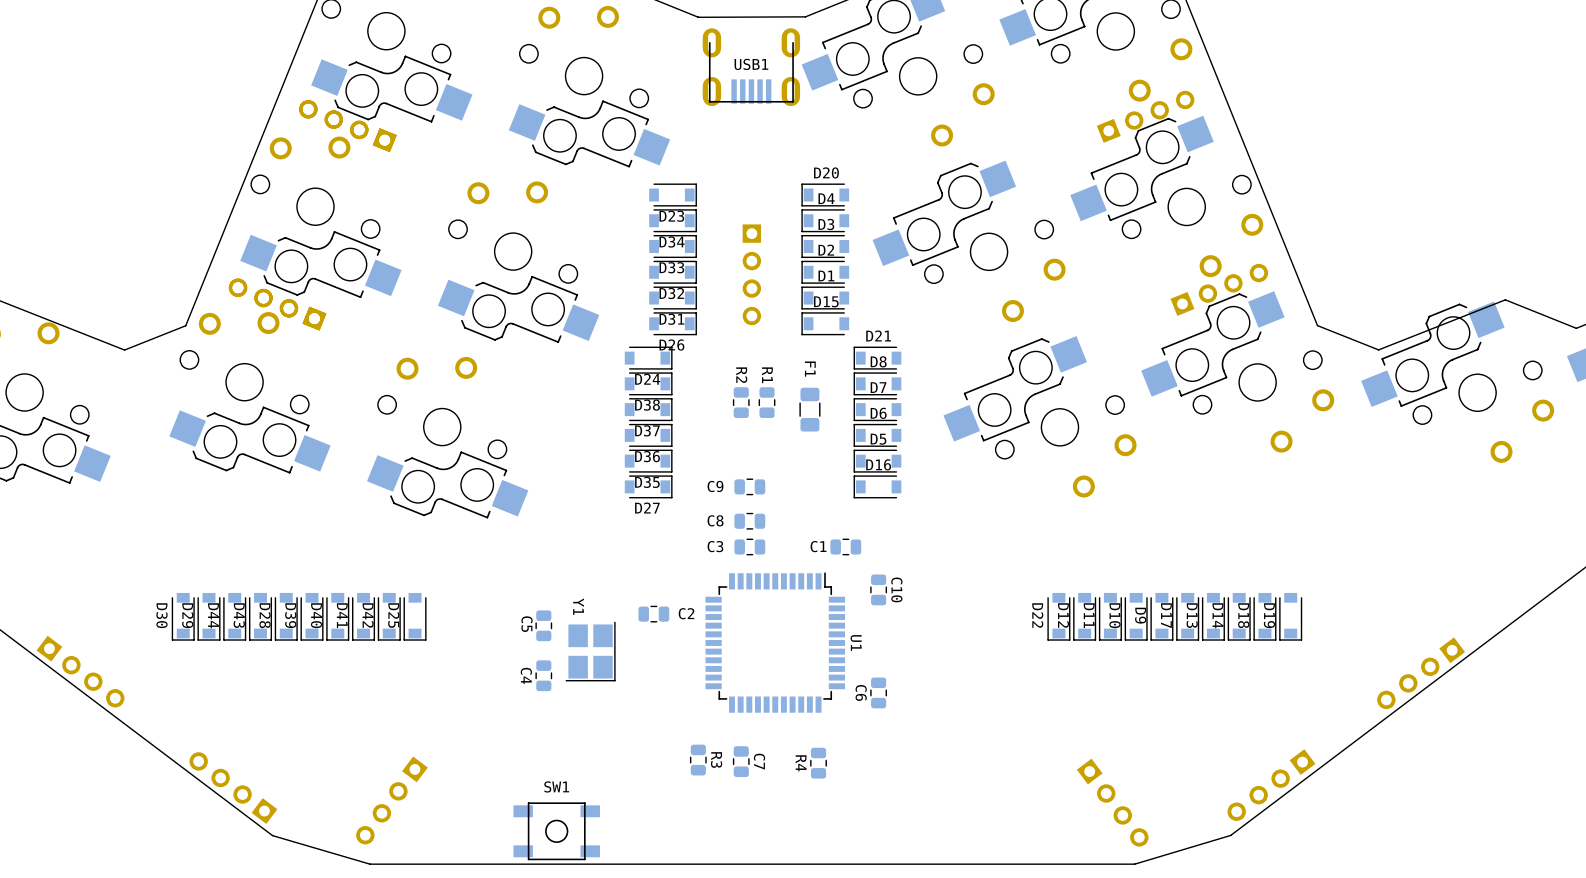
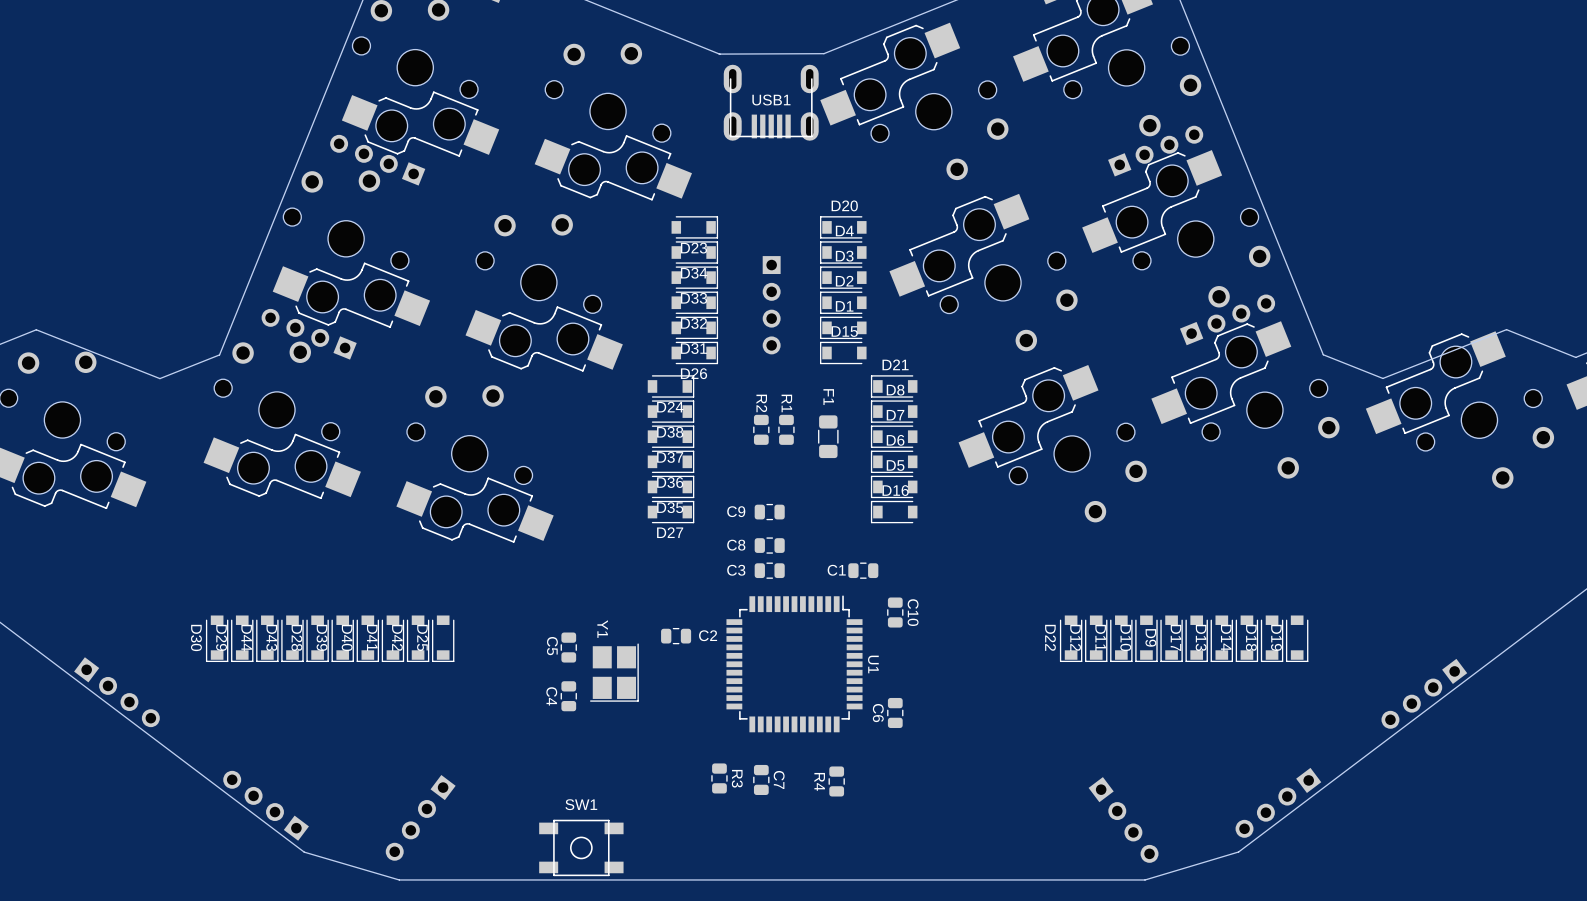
part: (347, 126) -> none
part: (277, 304) -> none

